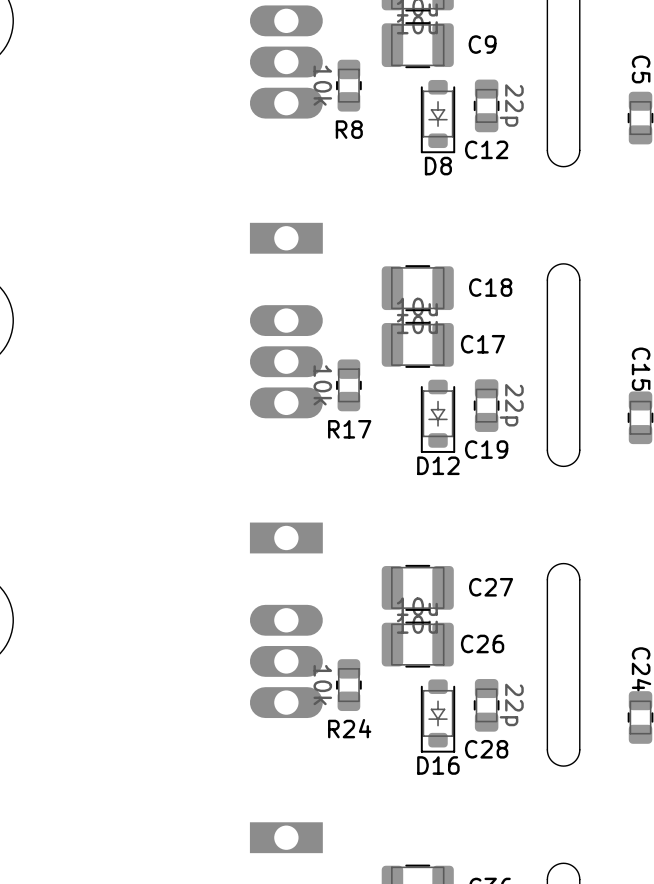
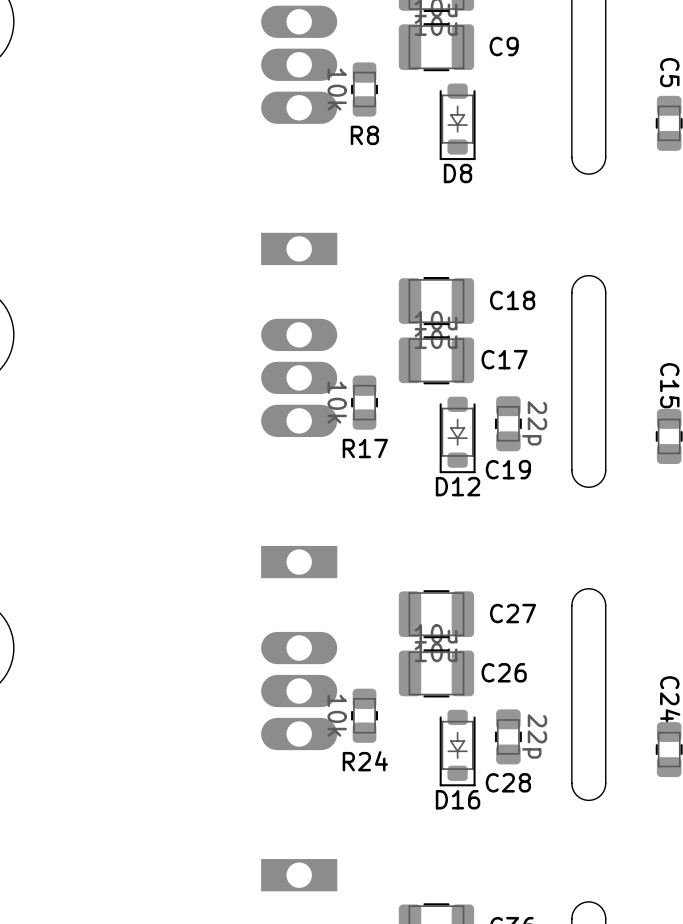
C12: 22p (486, 105) -> none

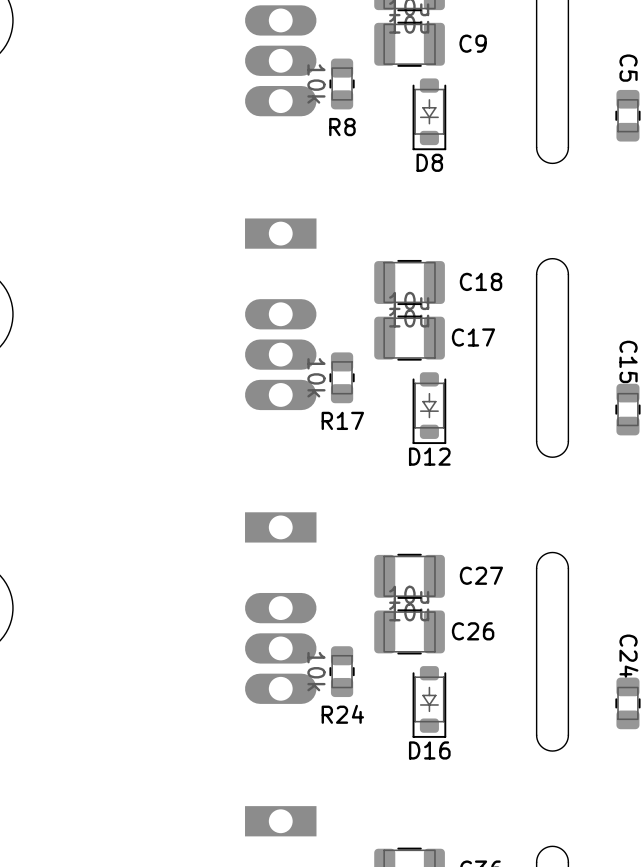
C19: 22p (508, 423) -> none
C28: 22p (508, 736) -> none

